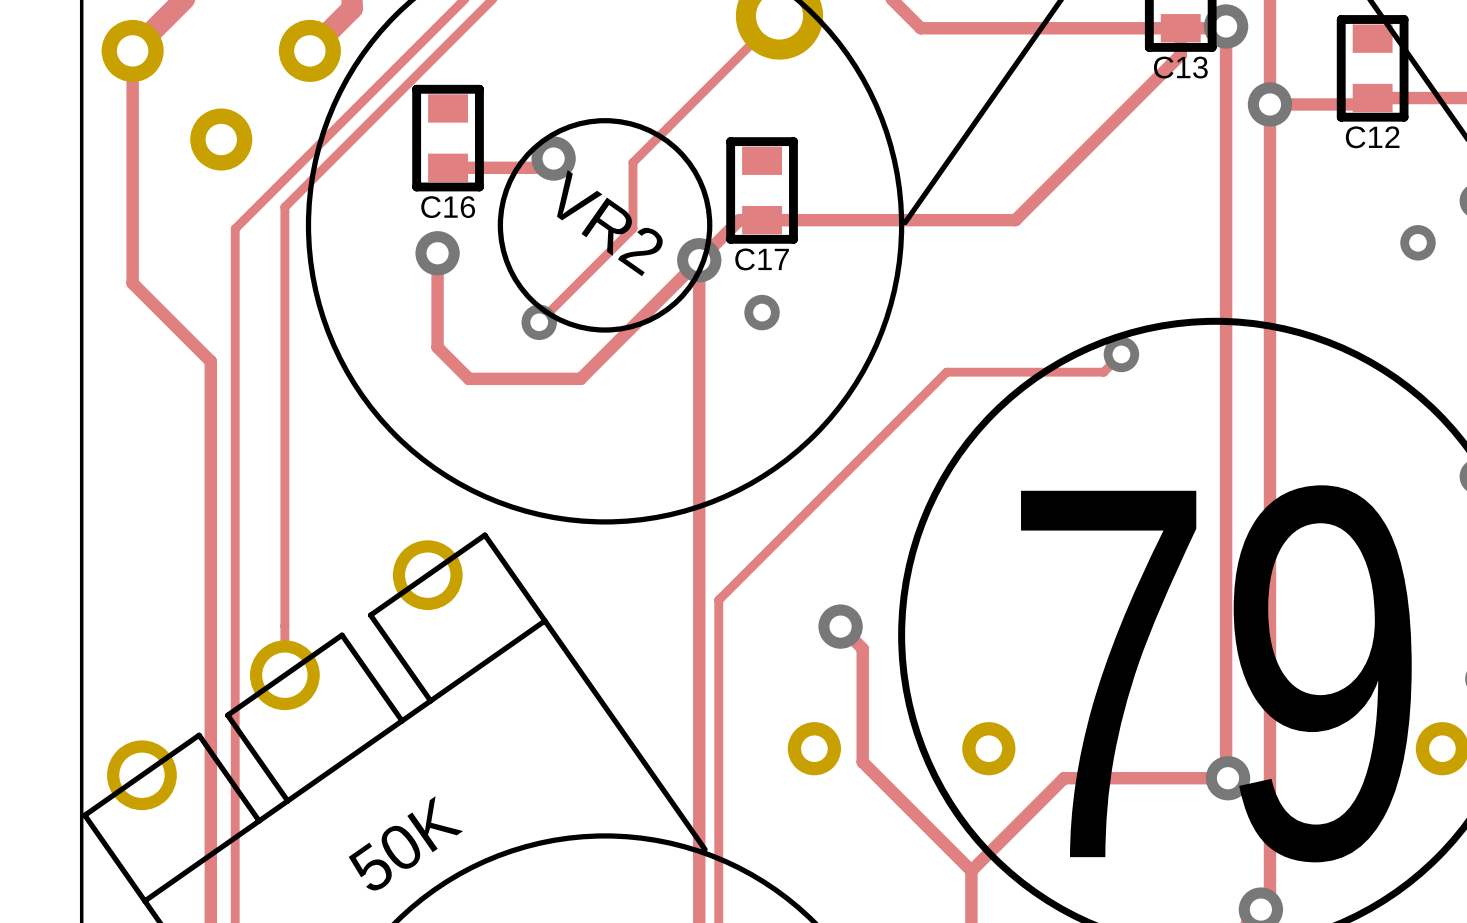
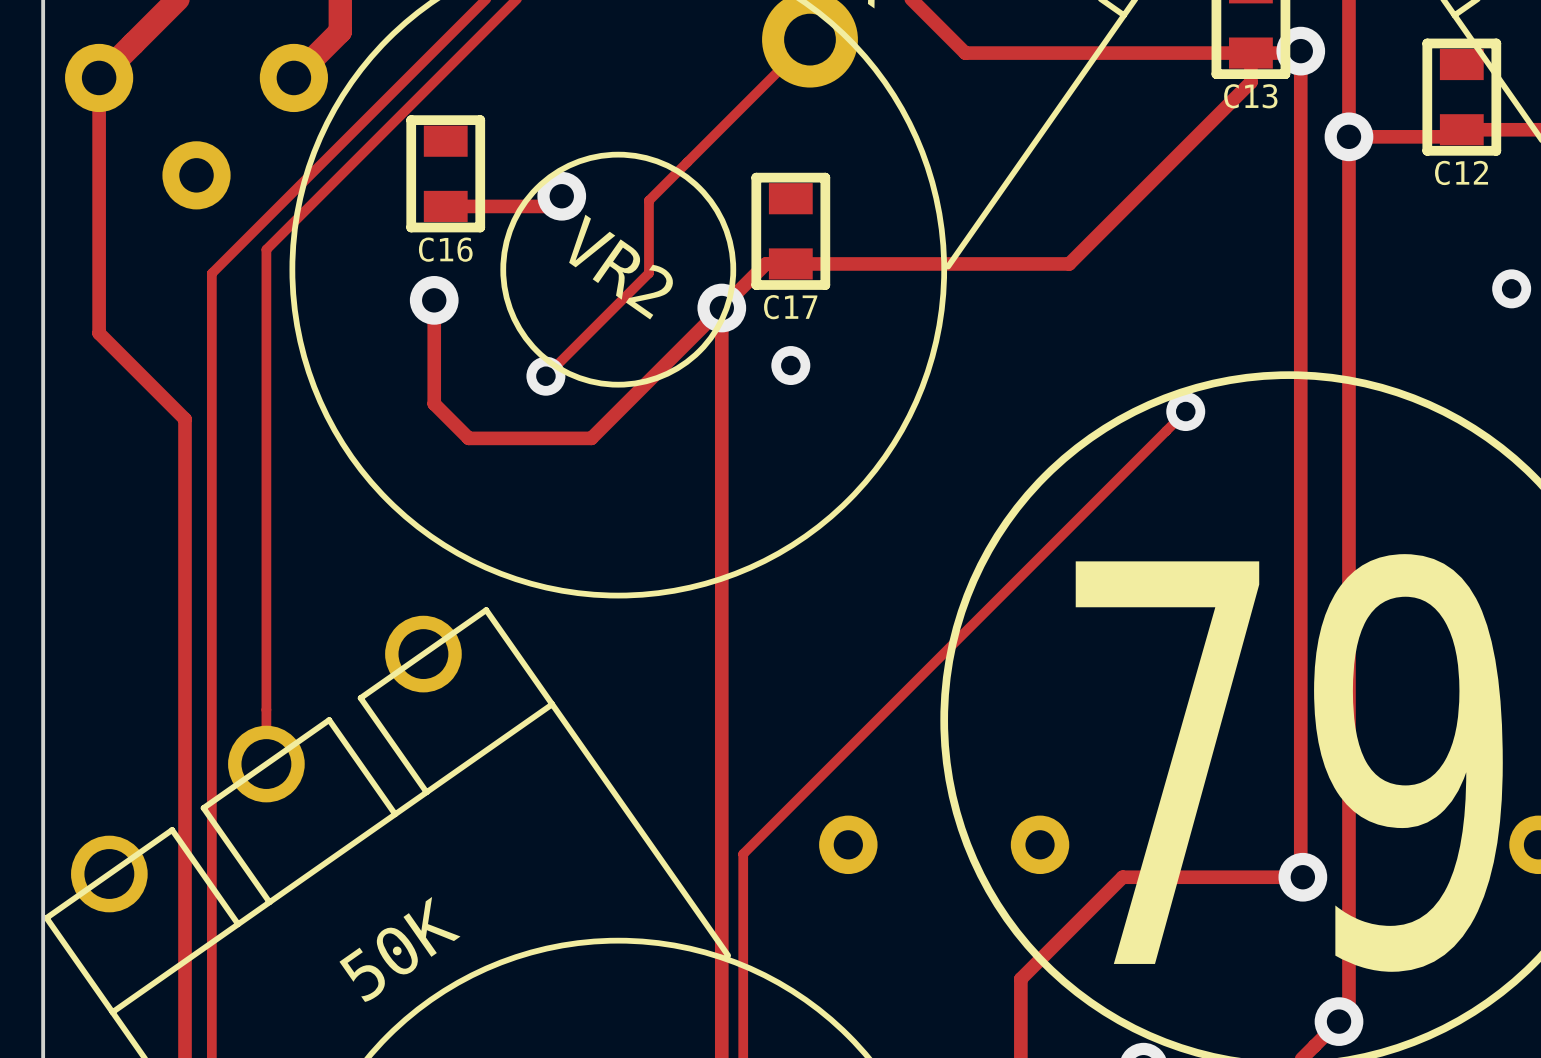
track: (1103, 372) (946, 372) (718, 600) (718, 757) -> (1166, 431) (743, 854)
track: (840, 626) (862, 648) (862, 762) (971, 870) -> none
via: (840, 626) -> none

